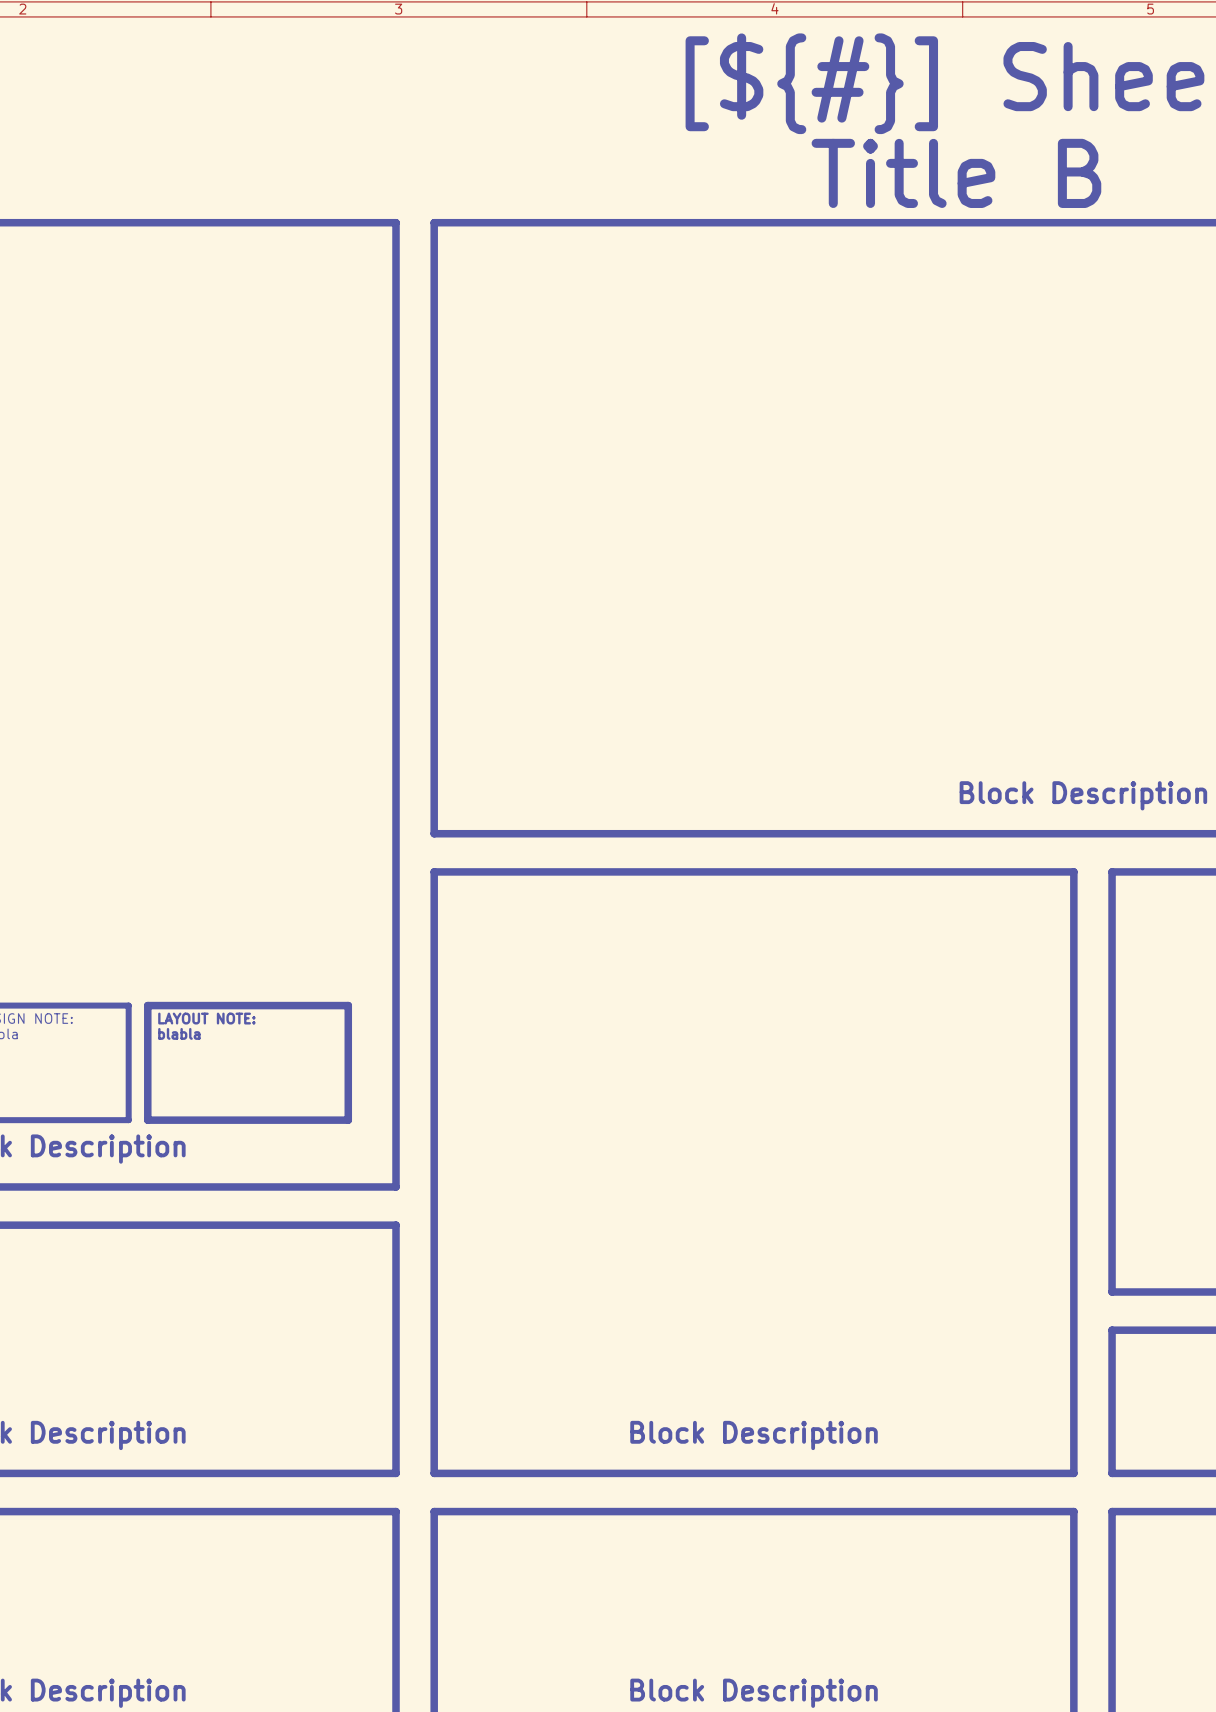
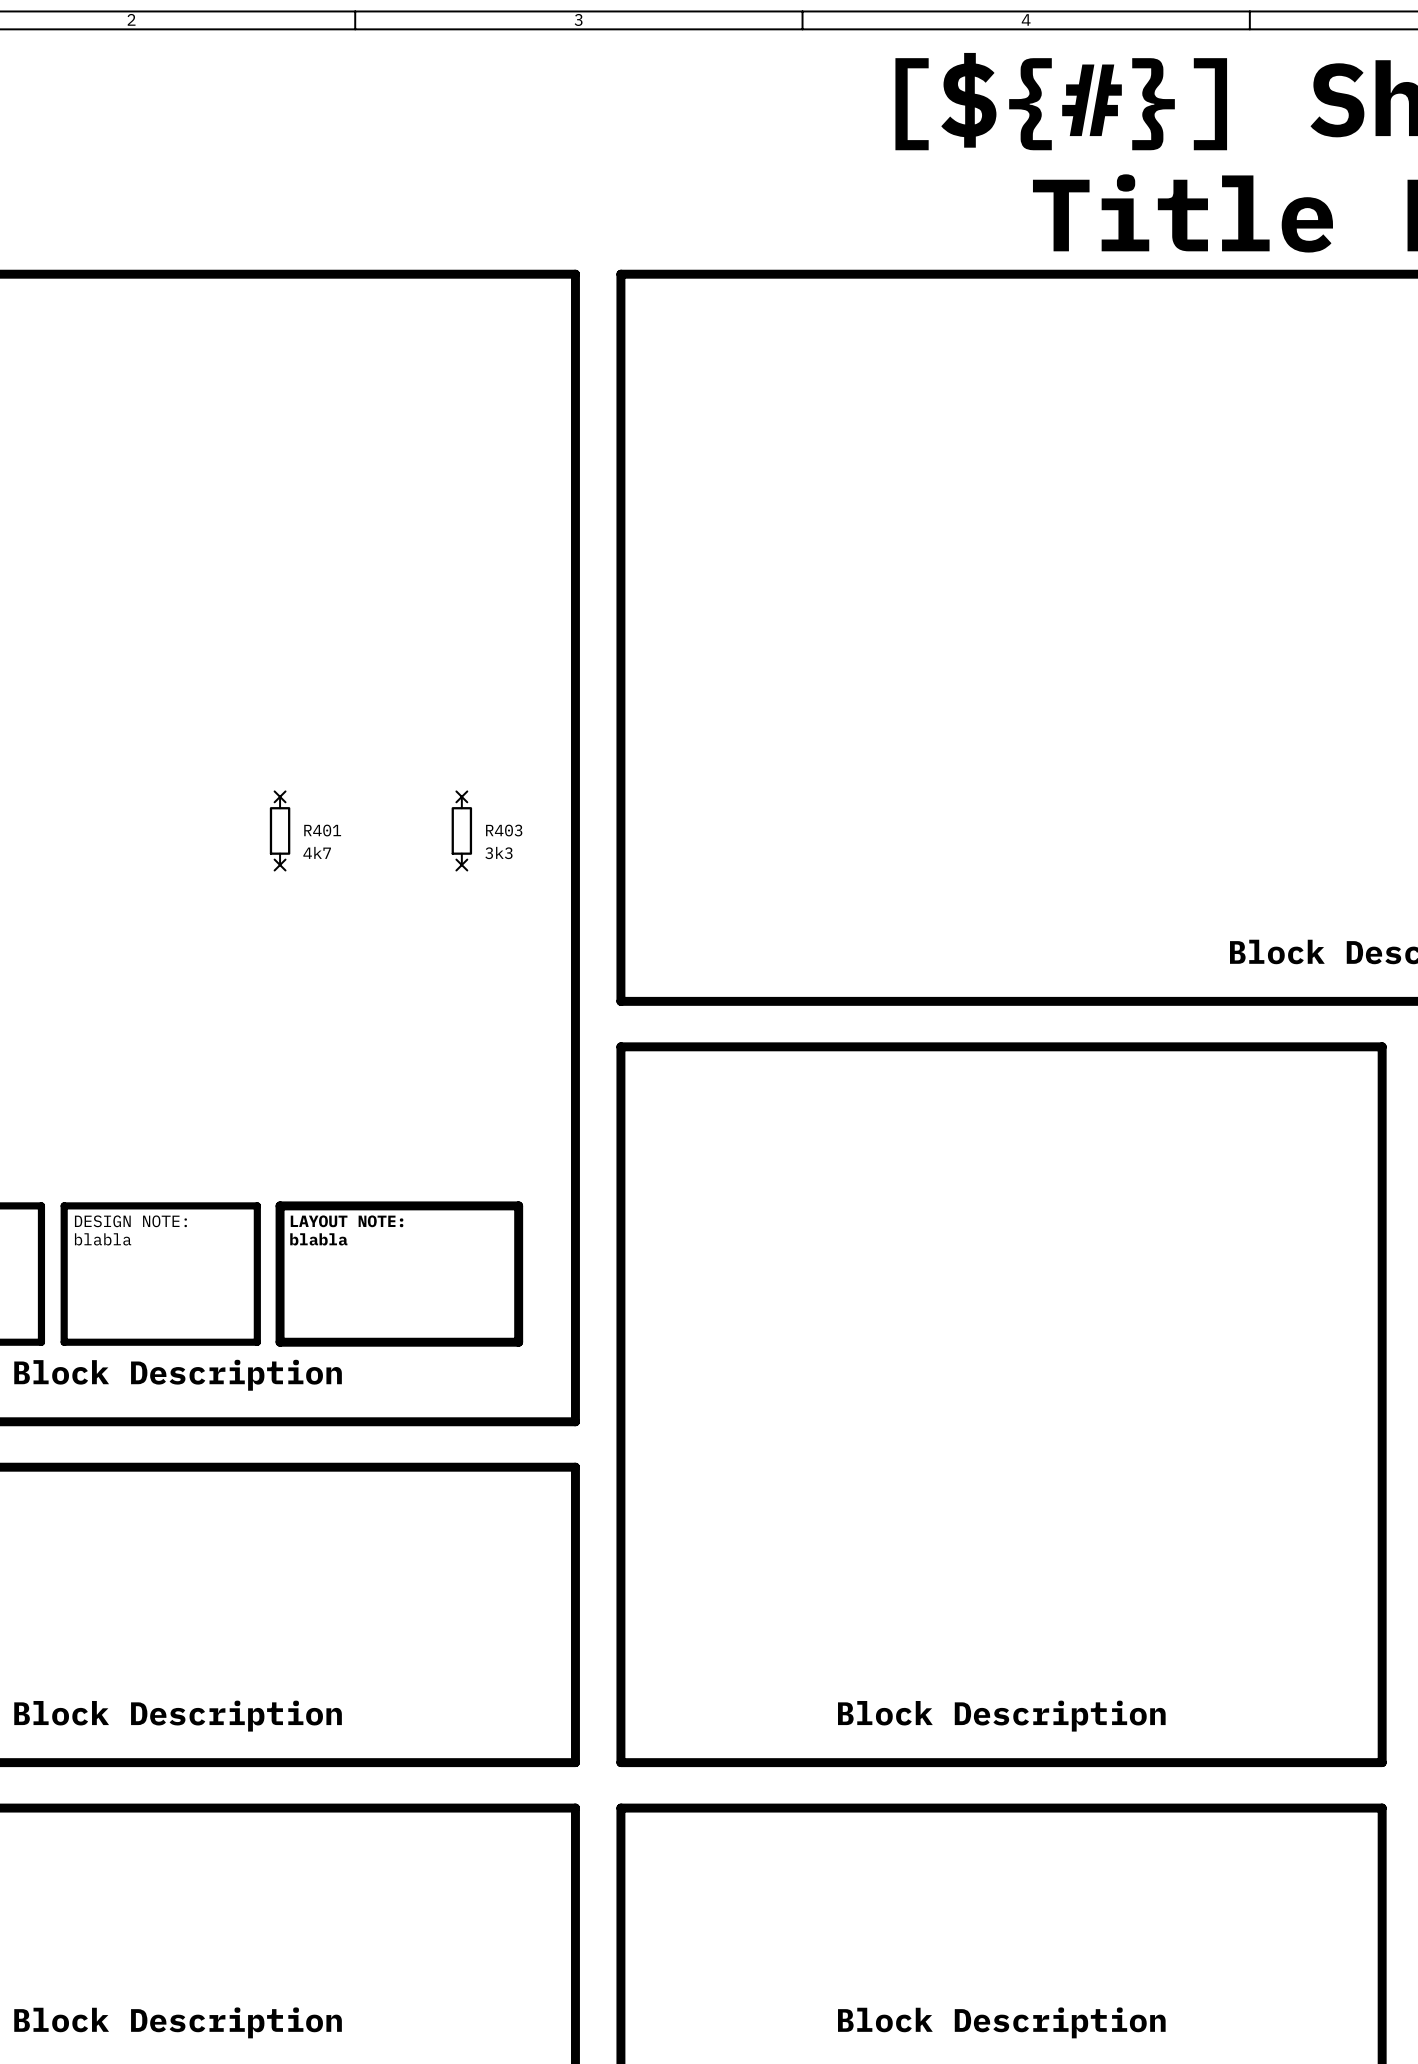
no-connect mark: none -> (280, 796)
no-connect mark: none -> (461, 796)
R401: none -> 4k7 (280, 830)
R403: none -> 3k3 (461, 830)
no-connect mark: none -> (280, 865)
no-connect mark: none -> (461, 865)

